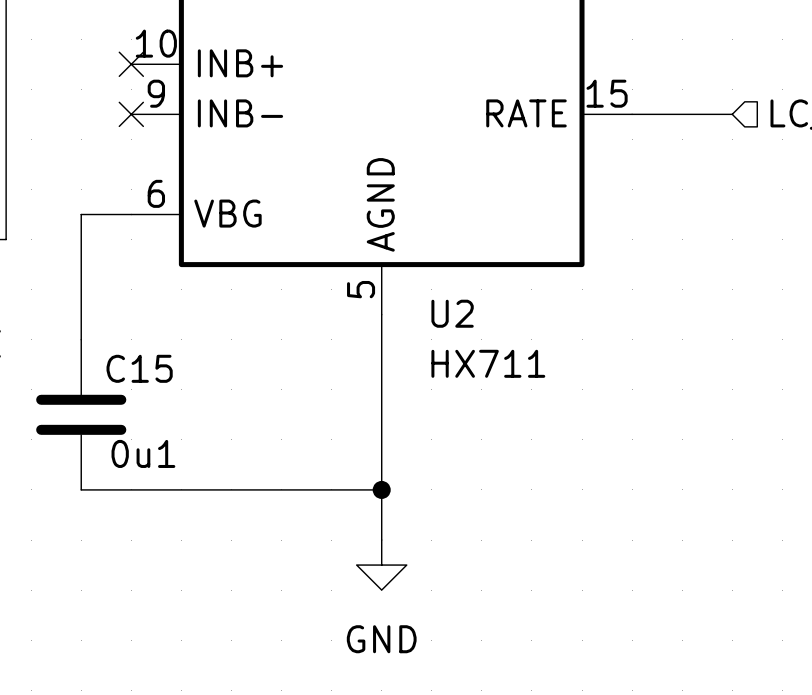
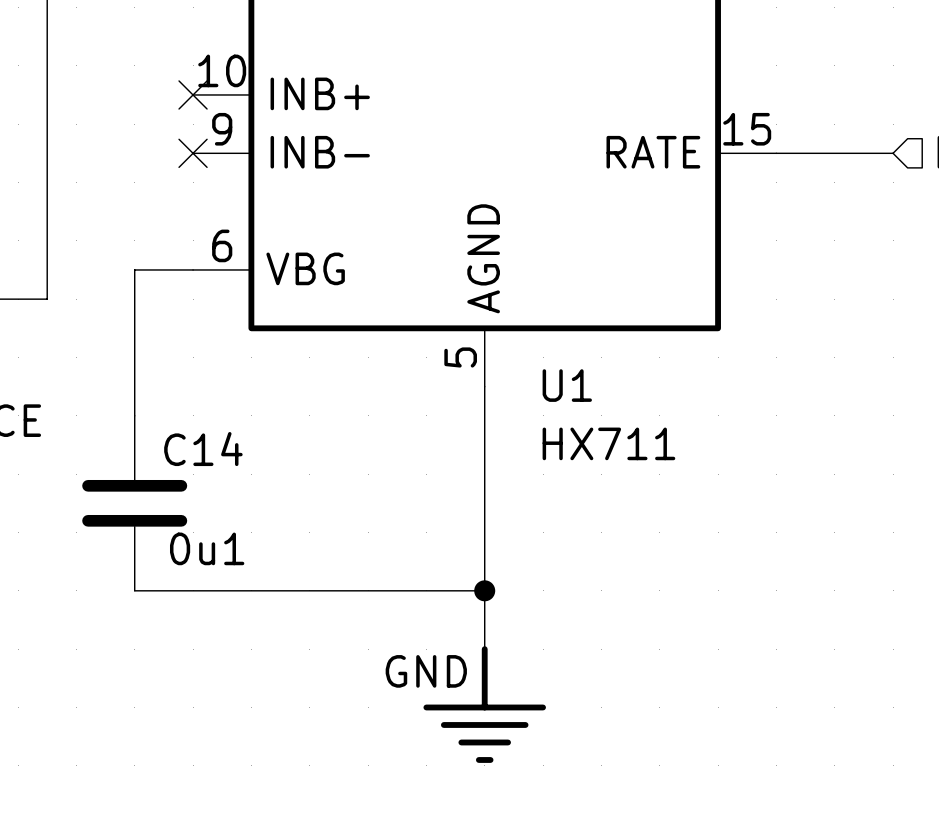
U2 name: U2 (452, 313) -> U1 (567, 385)
C15 name: C15 (139, 368) -> C14 (203, 449)
power symbol: GND (381, 565) -> none
power symbol: none -> GND (484, 704)

